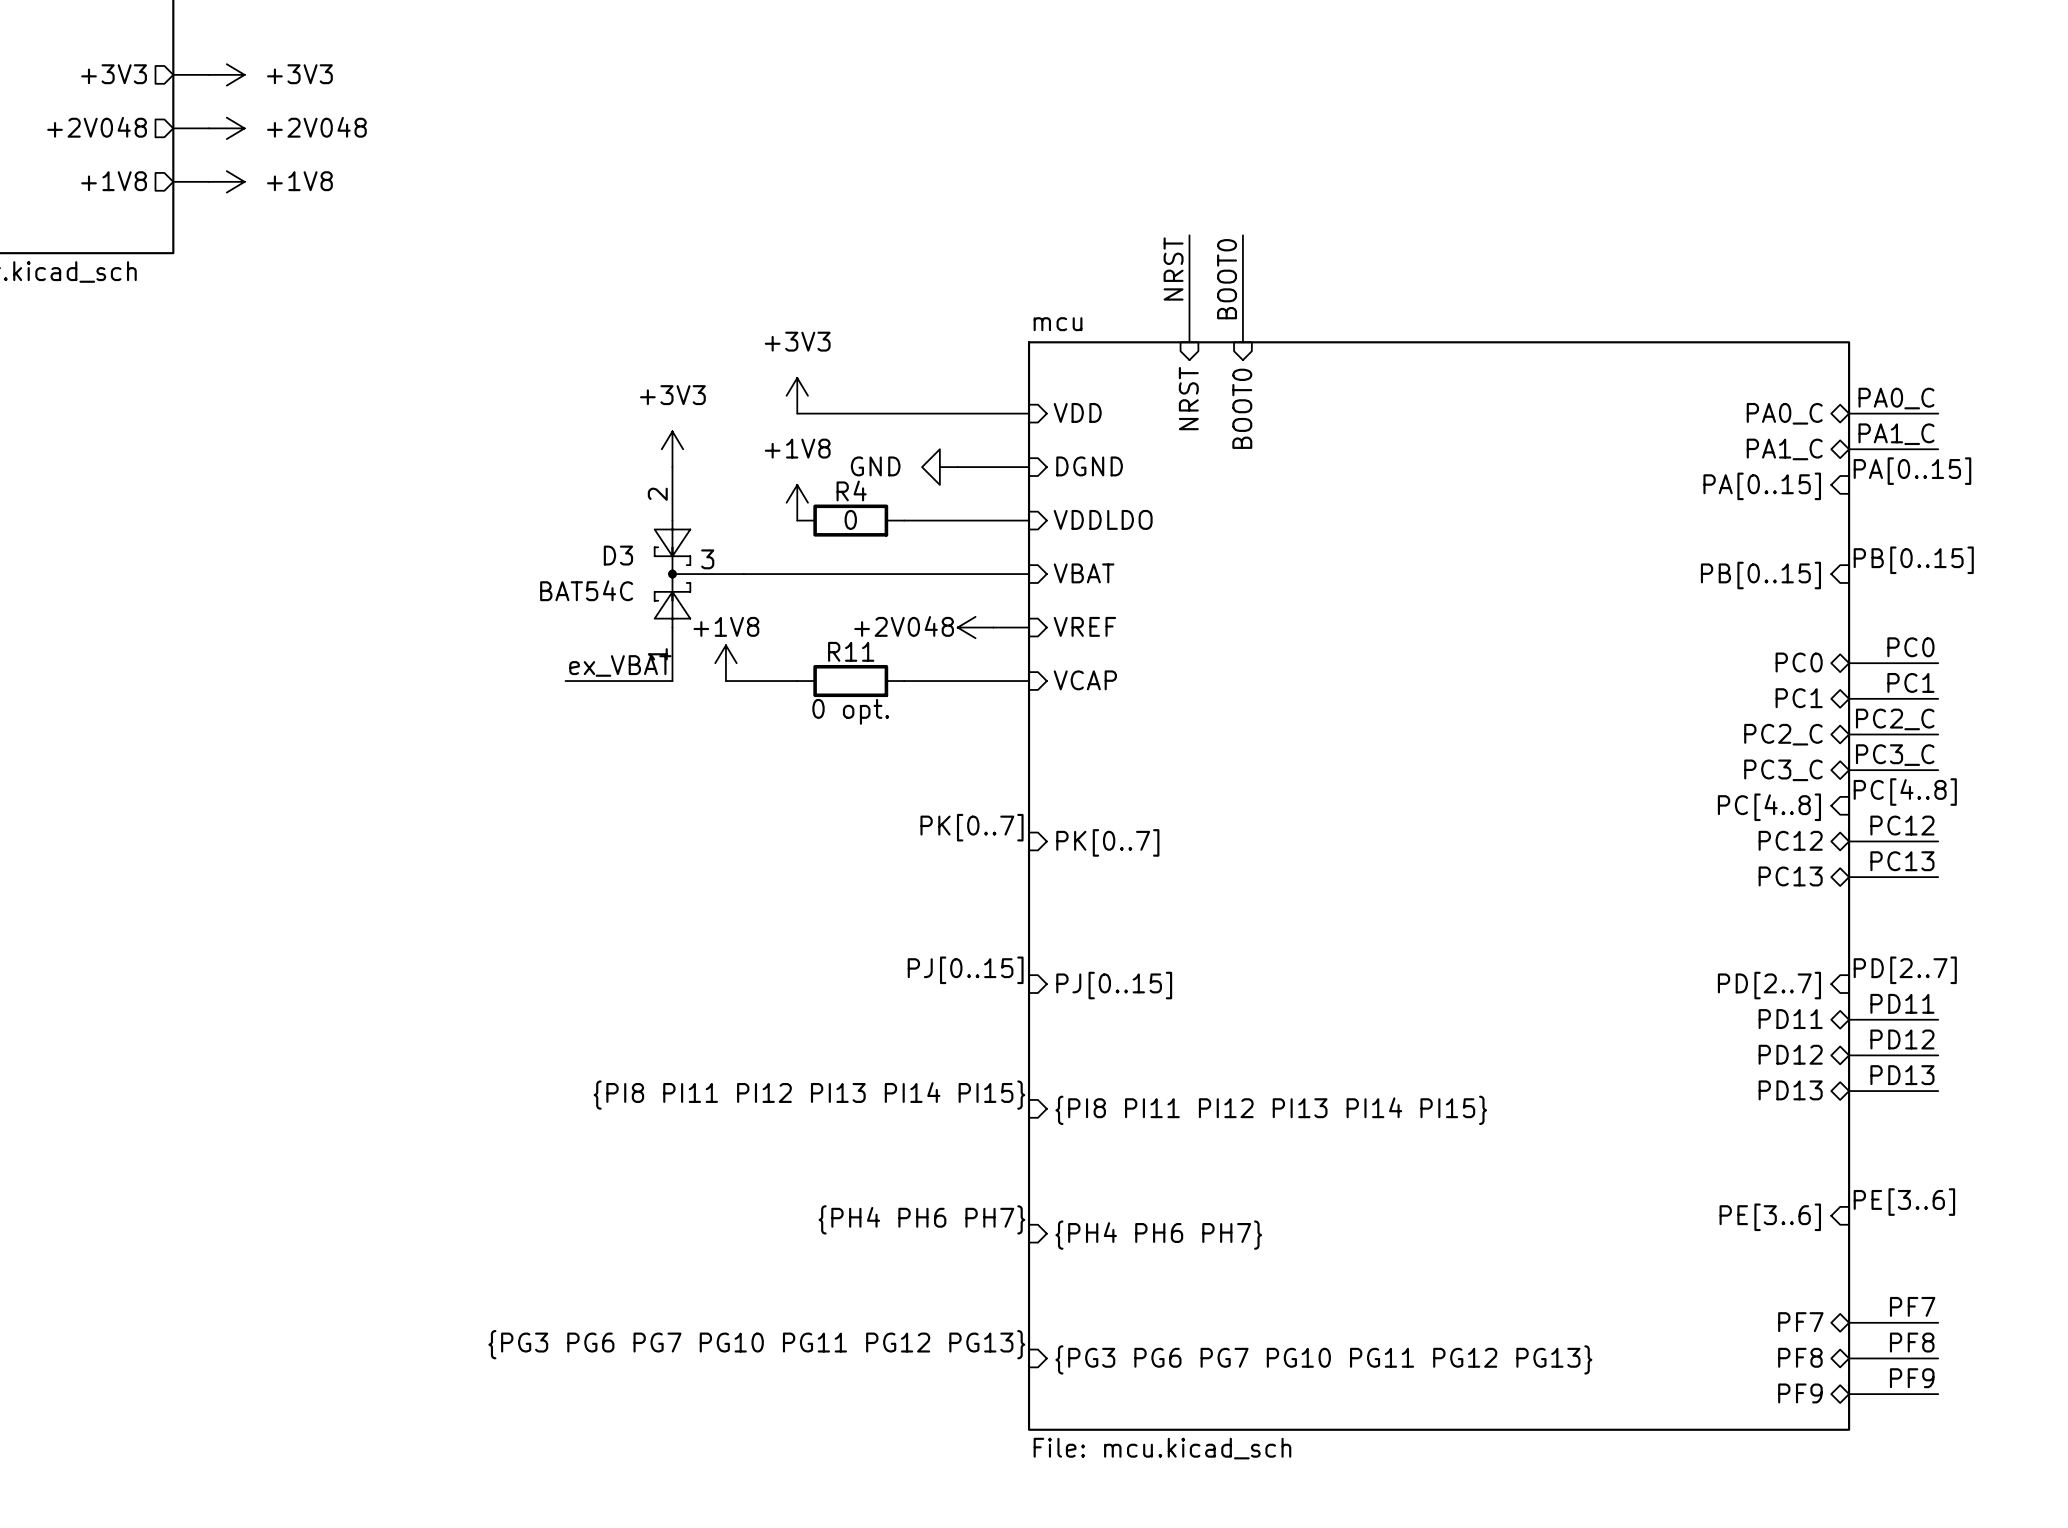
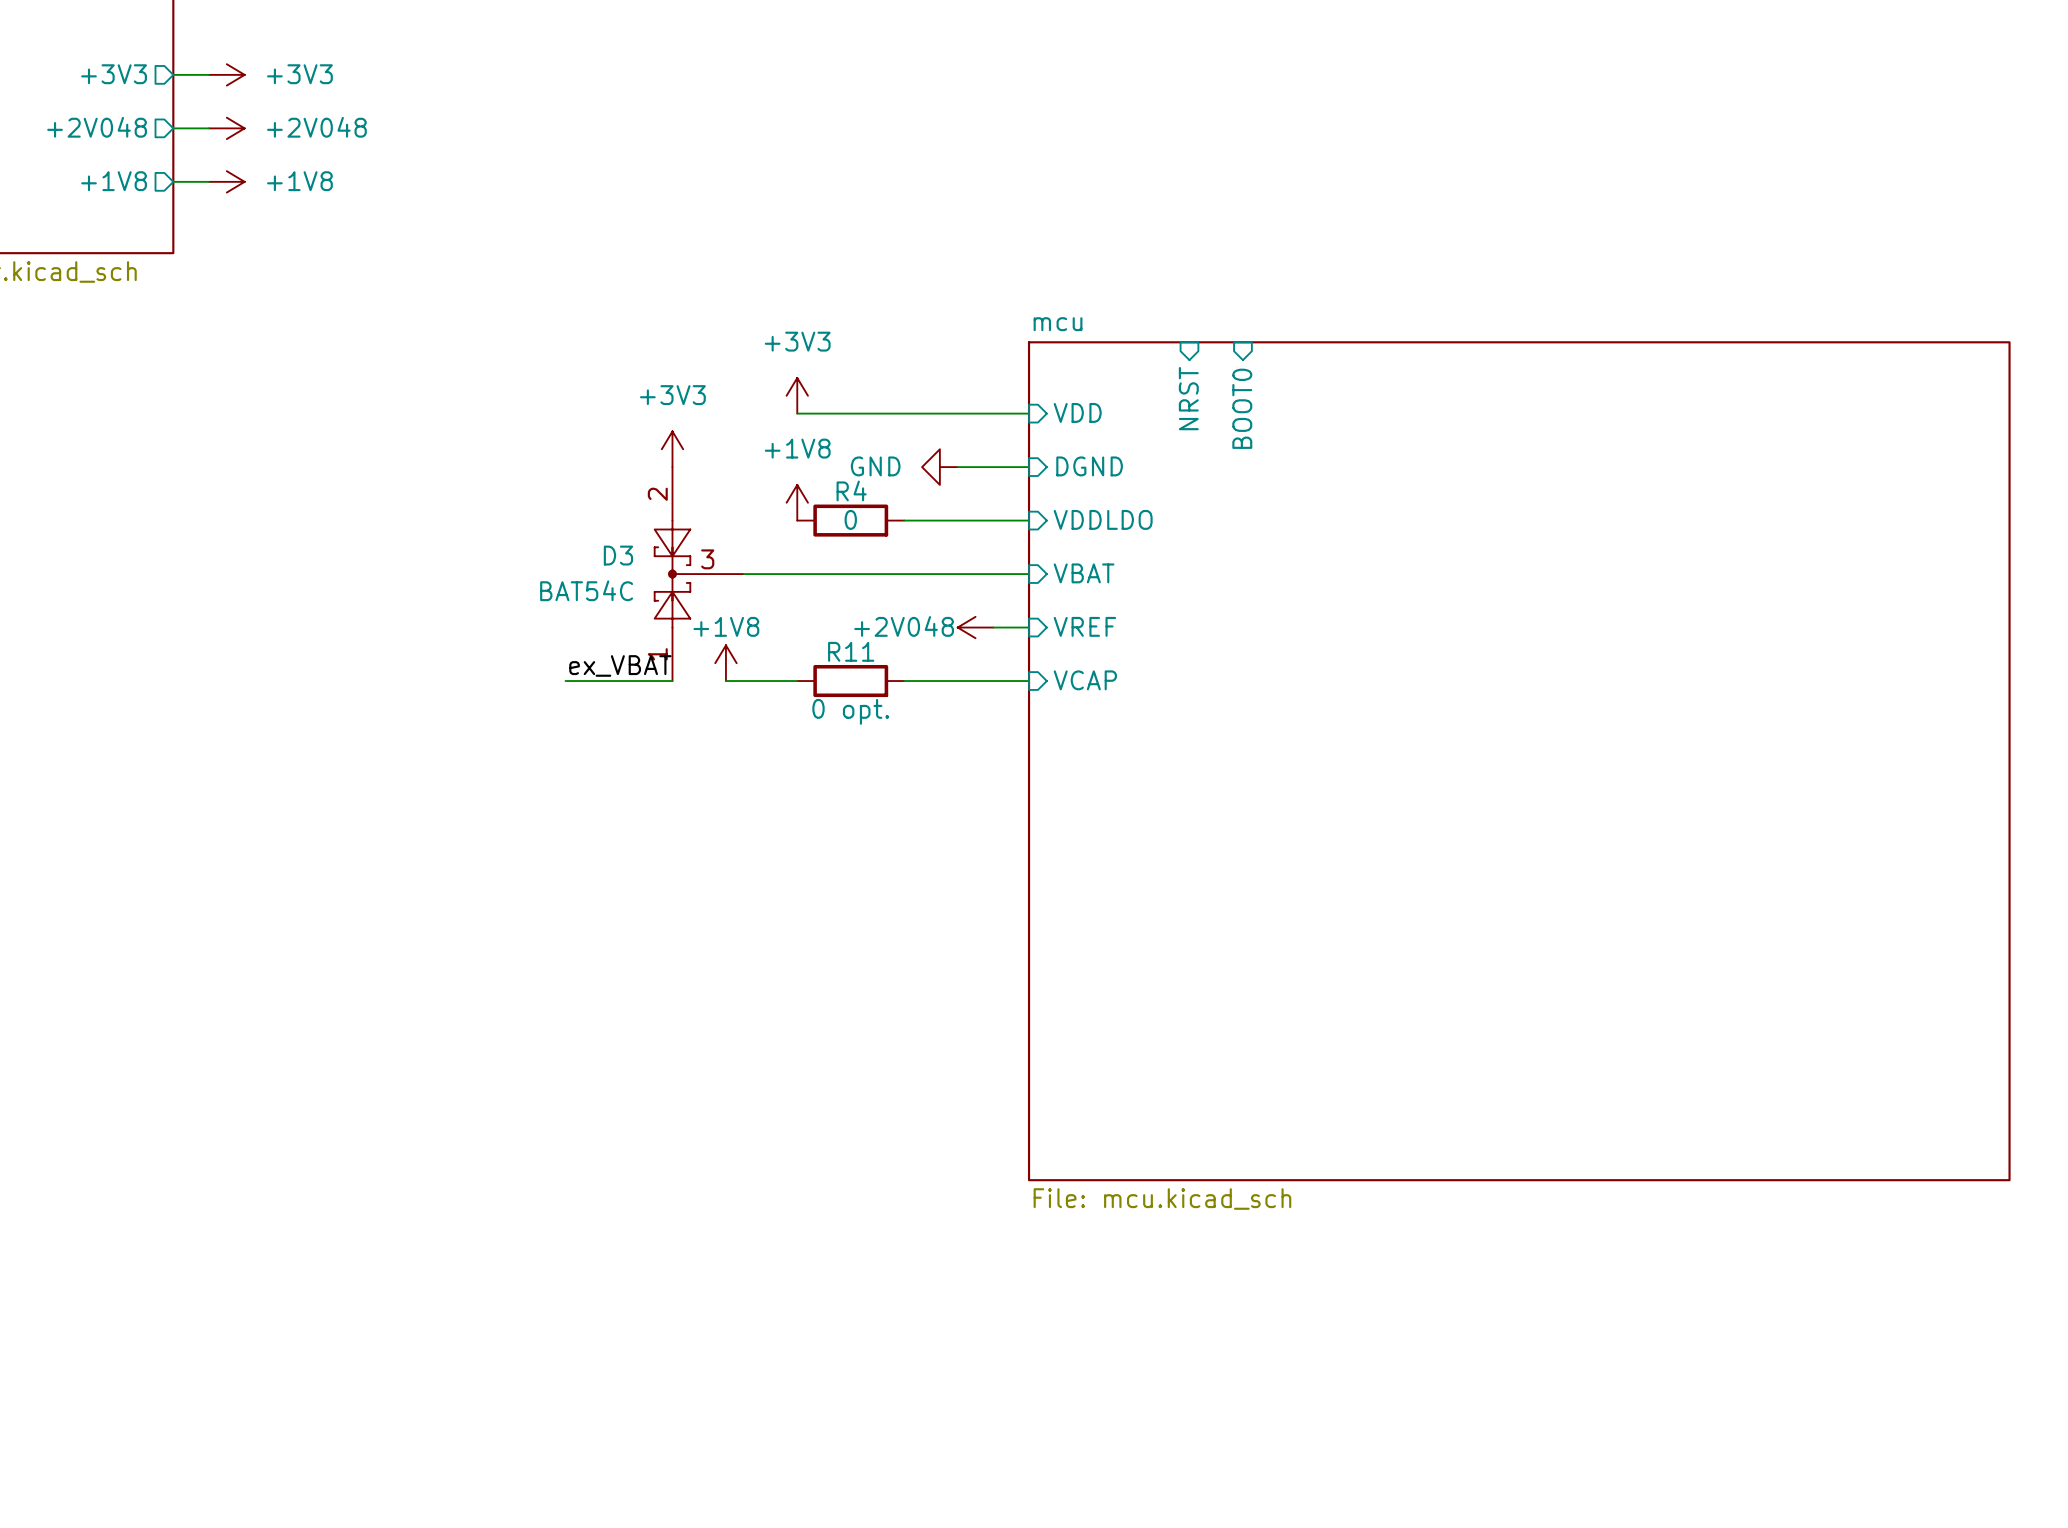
wire: (1189, 235) (1189, 342) -> none
wire: (1242, 235) (1242, 342) -> none
label: NRST (1173, 269) -> none
label: BOOT0 (1227, 279) -> none
label: PA0_C (1896, 398) -> none
sheet pin: PA0_C (1784, 413) -> none
wire: (1849, 413) (1938, 413) -> none
label: PA1_C (1896, 434) -> none
sheet pin: PA1_C (1784, 449) -> none
wire: (1849, 449) (1938, 449) -> none
label: PA[0..15] (1912, 471) -> none
sheet pin: PA[0..15] (1762, 486) -> none
label: PB[0..15] (1913, 560) -> none
sheet pin: PB[0..15] (1760, 575) -> none
label: PC0 (1910, 647) -> none
sheet pin: PC0 (1799, 662) -> none
wire: (1849, 663) (1938, 663) -> none
label: PC1 (1910, 682) -> none
sheet pin: PC1 (1799, 698) -> none
wire: (1849, 698) (1938, 698) -> none
label: PC2_C (1895, 719) -> none
sheet pin: PC2_C (1783, 734) -> none
wire: (1849, 734) (1938, 734) -> none
label: PC3_C (1895, 755) -> none
sheet mcu: none -> File: mcu.kicad_sch (1519, 761)
sheet pin: PC3_C (1783, 770) -> none
wire: (1849, 770) (1938, 770) -> none
label: PC[4..8] (1905, 792) -> none
sheet pin: PC[4..8] (1769, 807) -> none
label: PC12 (1902, 825) -> none
label: PK[0..7] (972, 827) -> none
sheet pin: PC12 (1790, 840) -> none
wire: (1849, 841) (1938, 841) -> none
sheet pin: PK[0..7] (1107, 842) -> none
label: PC13 (1902, 861) -> none
sheet pin: PC13 (1790, 876) -> none
wire: (1849, 877) (1938, 877) -> none
sheet mcu: File: mcu.kicad_sch (1439, 886) -> none
label: PJ[0..15] (965, 970) -> none
label: PD[2..7] (1905, 970) -> none
sheet pin: PJ[0..15] (1114, 985) -> none
sheet pin: PD[2..7] (1769, 985) -> none
label: PD11 (1902, 1003) -> none
sheet pin: PD11 (1790, 1019) -> none
wire: (1849, 1019) (1938, 1019) -> none
label: PD12 (1902, 1039) -> none
sheet pin: PD12 (1790, 1054) -> none
wire: (1849, 1055) (1938, 1055) -> none
label: PD13 (1902, 1075) -> none
sheet pin: PD13 (1790, 1090) -> none
wire: (1849, 1091) (1938, 1091) -> none
label: {PI8 PI11 PI12 PI13 PI14 PI15} (809, 1095) -> none
sheet pin: {PI8 PI11 PI12 PI13 PI14 PI15} (1271, 1110) -> none
label: PE[3..6] (1904, 1202) -> none
sheet pin: PE[3..6] (1770, 1217) -> none
label: {PH4 PH6 PH7} (921, 1219) -> none
sheet pin: {PH4 PH6 PH7} (1158, 1235) -> none
label: PF7 (1912, 1306) -> none
sheet pin: PF7 (1800, 1322) -> none
wire: (1849, 1322) (1938, 1322) -> none
label: PF8 (1912, 1342) -> none
label: {PG3 PG6 PG7 PG10 PG11 PG12 PG13} (756, 1344) -> none
sheet pin: PF8 (1800, 1357) -> none
wire: (1849, 1358) (1938, 1358) -> none
sheet pin: {PG3 PG6 PG7 PG10 PG11 PG12 PG13} (1323, 1359) -> none
label: PF9 (1912, 1378) -> none
sheet pin: PF9 (1800, 1393) -> none
wire: (1849, 1394) (1938, 1394) -> none

